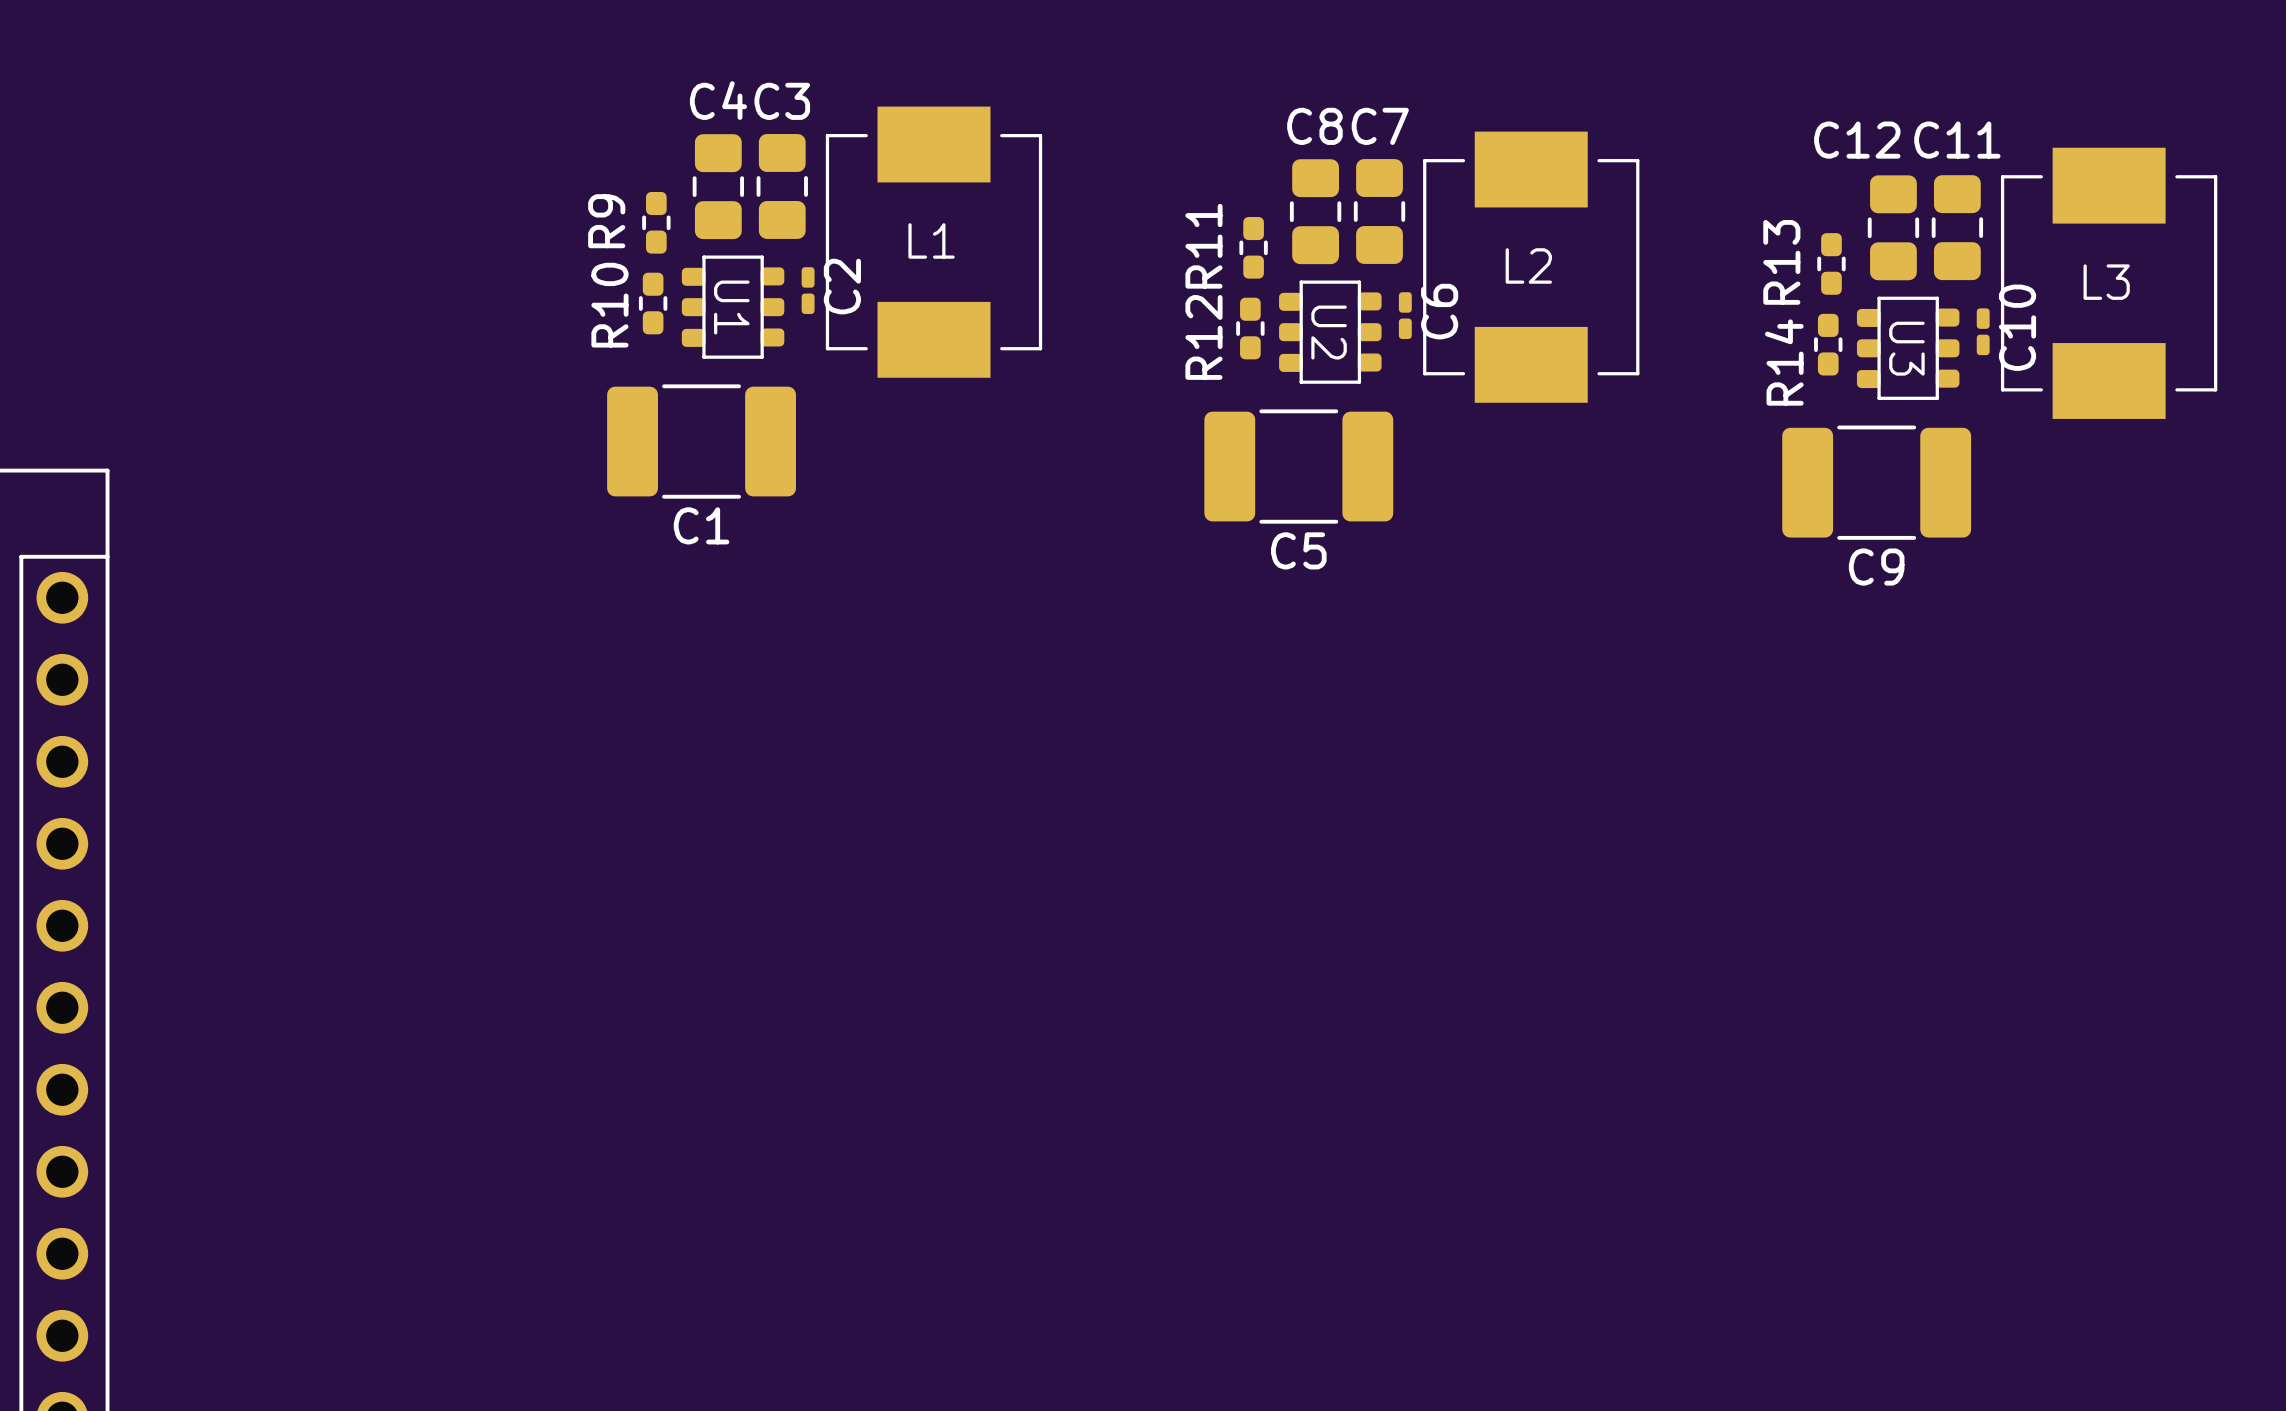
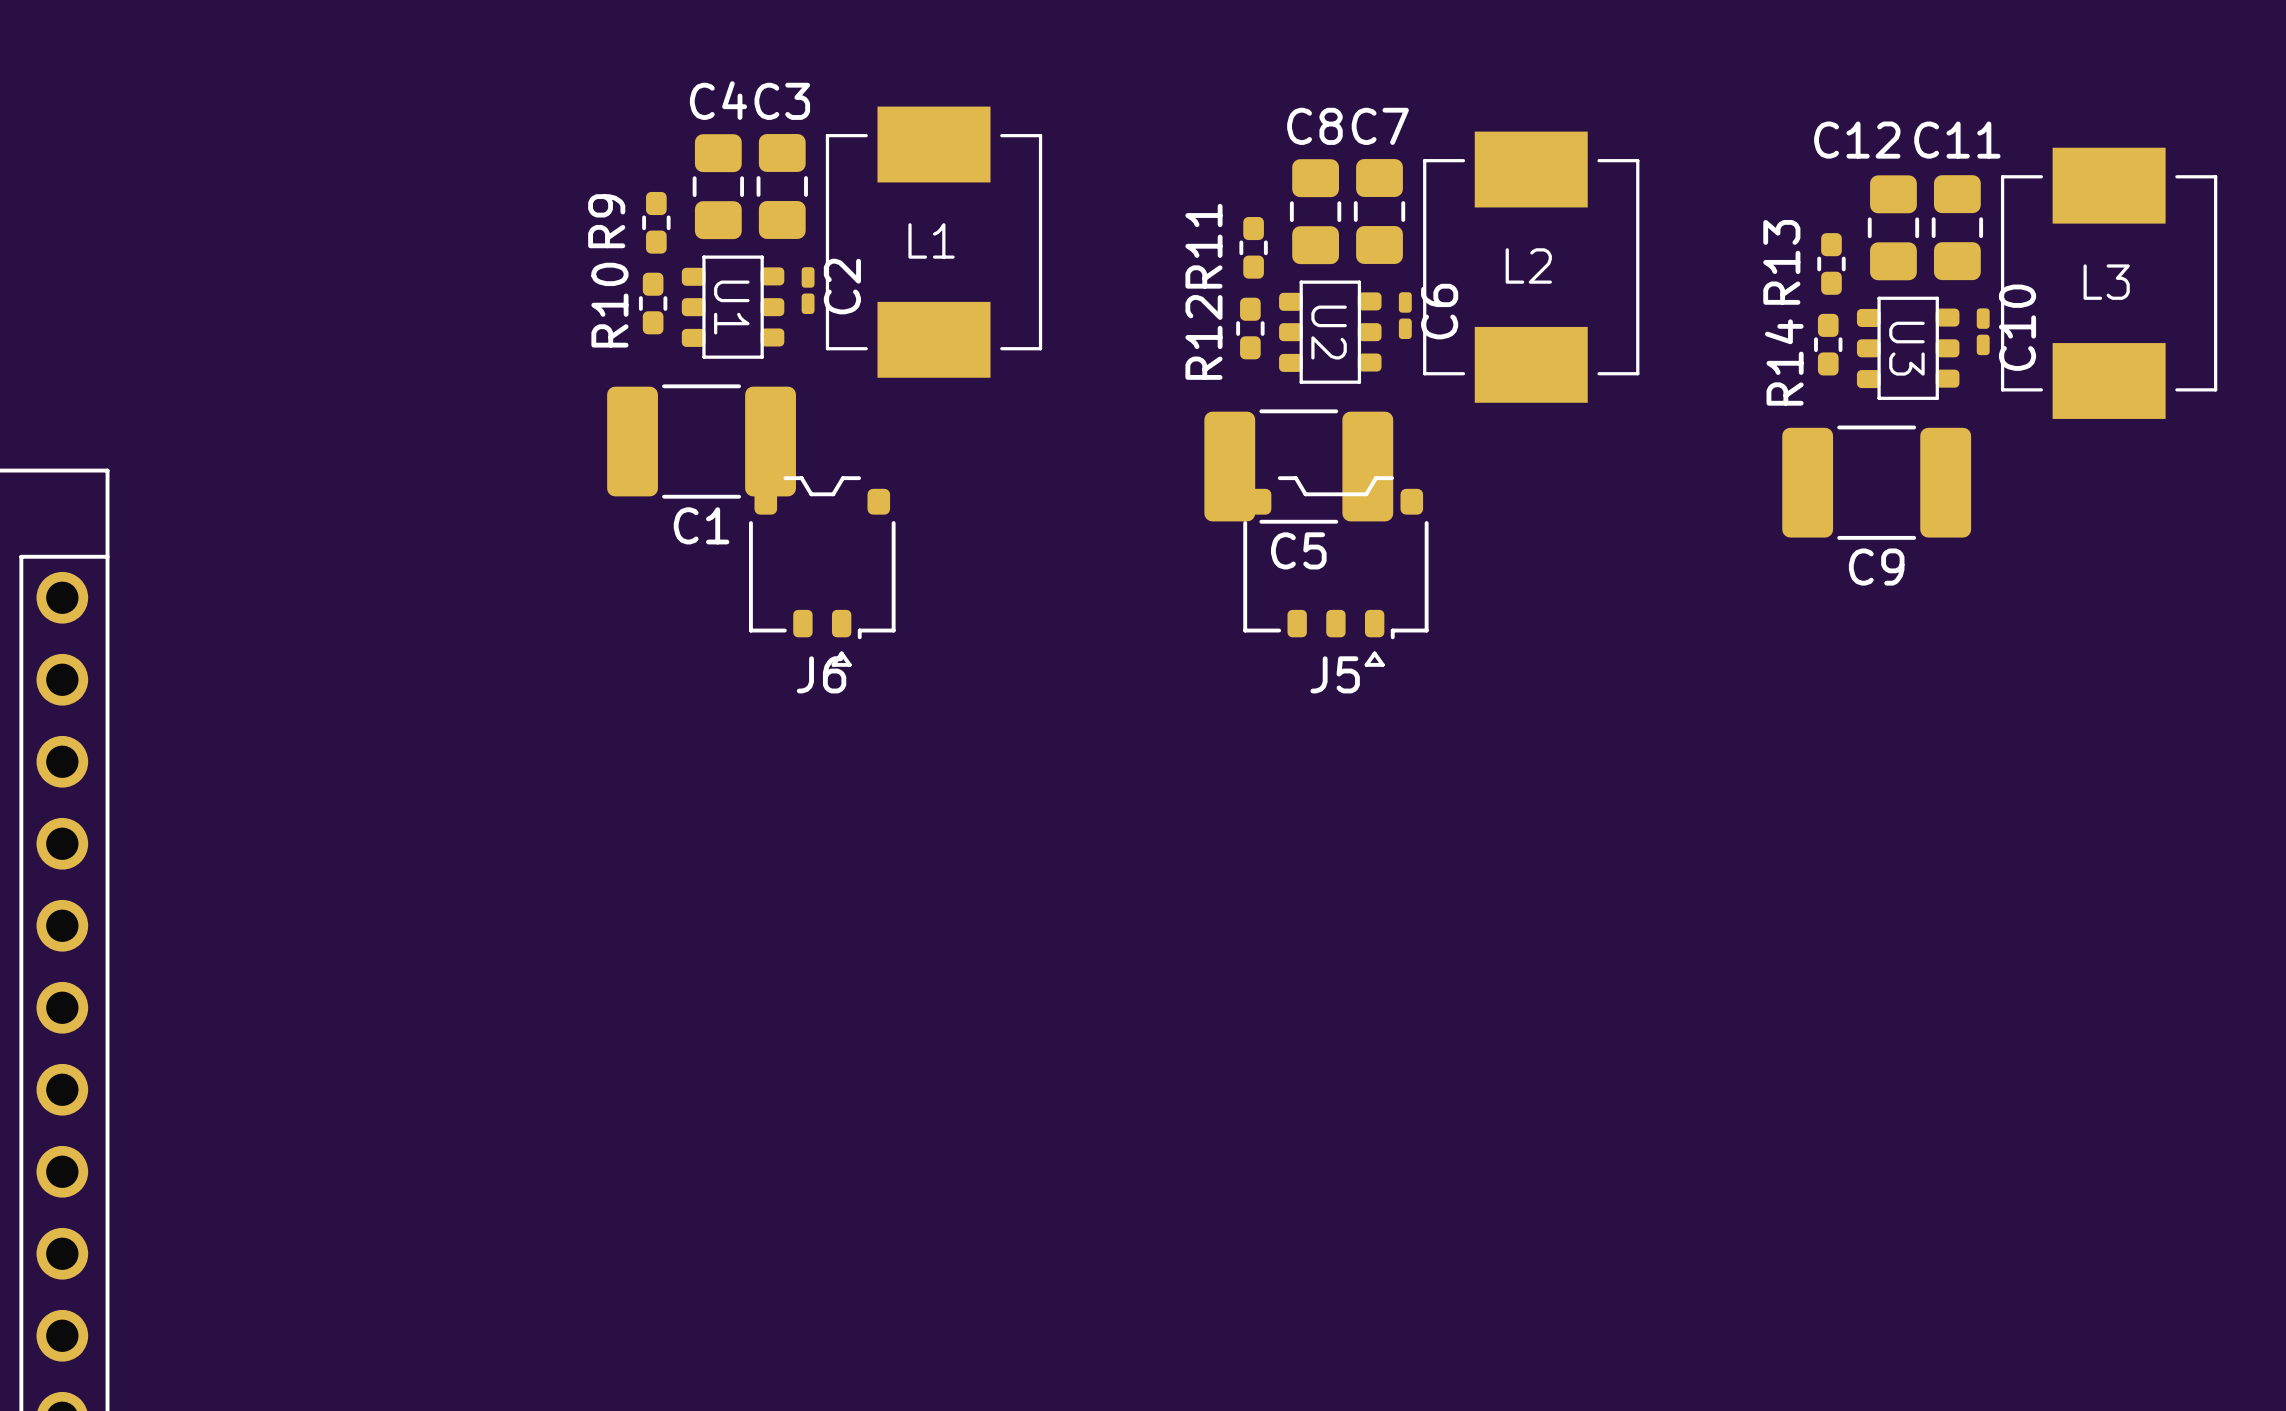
J6: none -> (822, 571)
J5: none -> (1335, 571)

